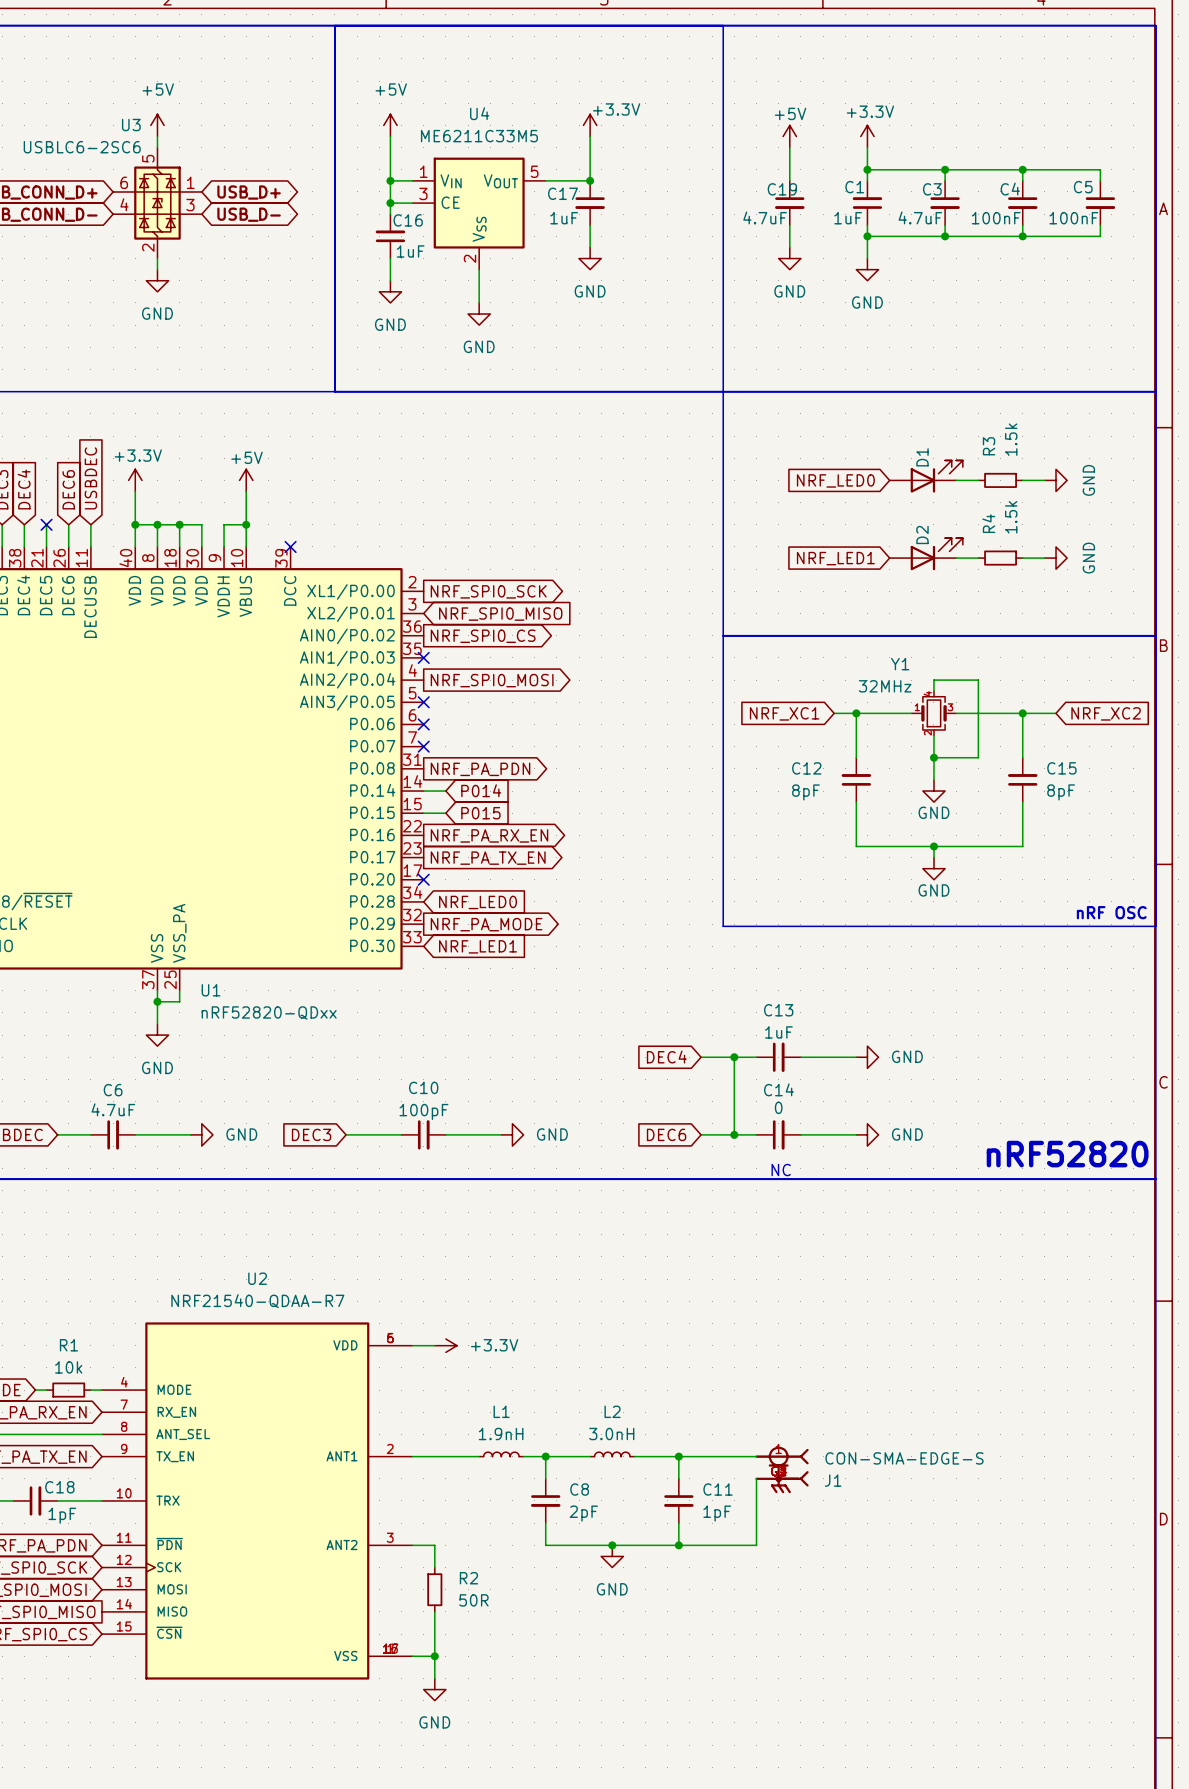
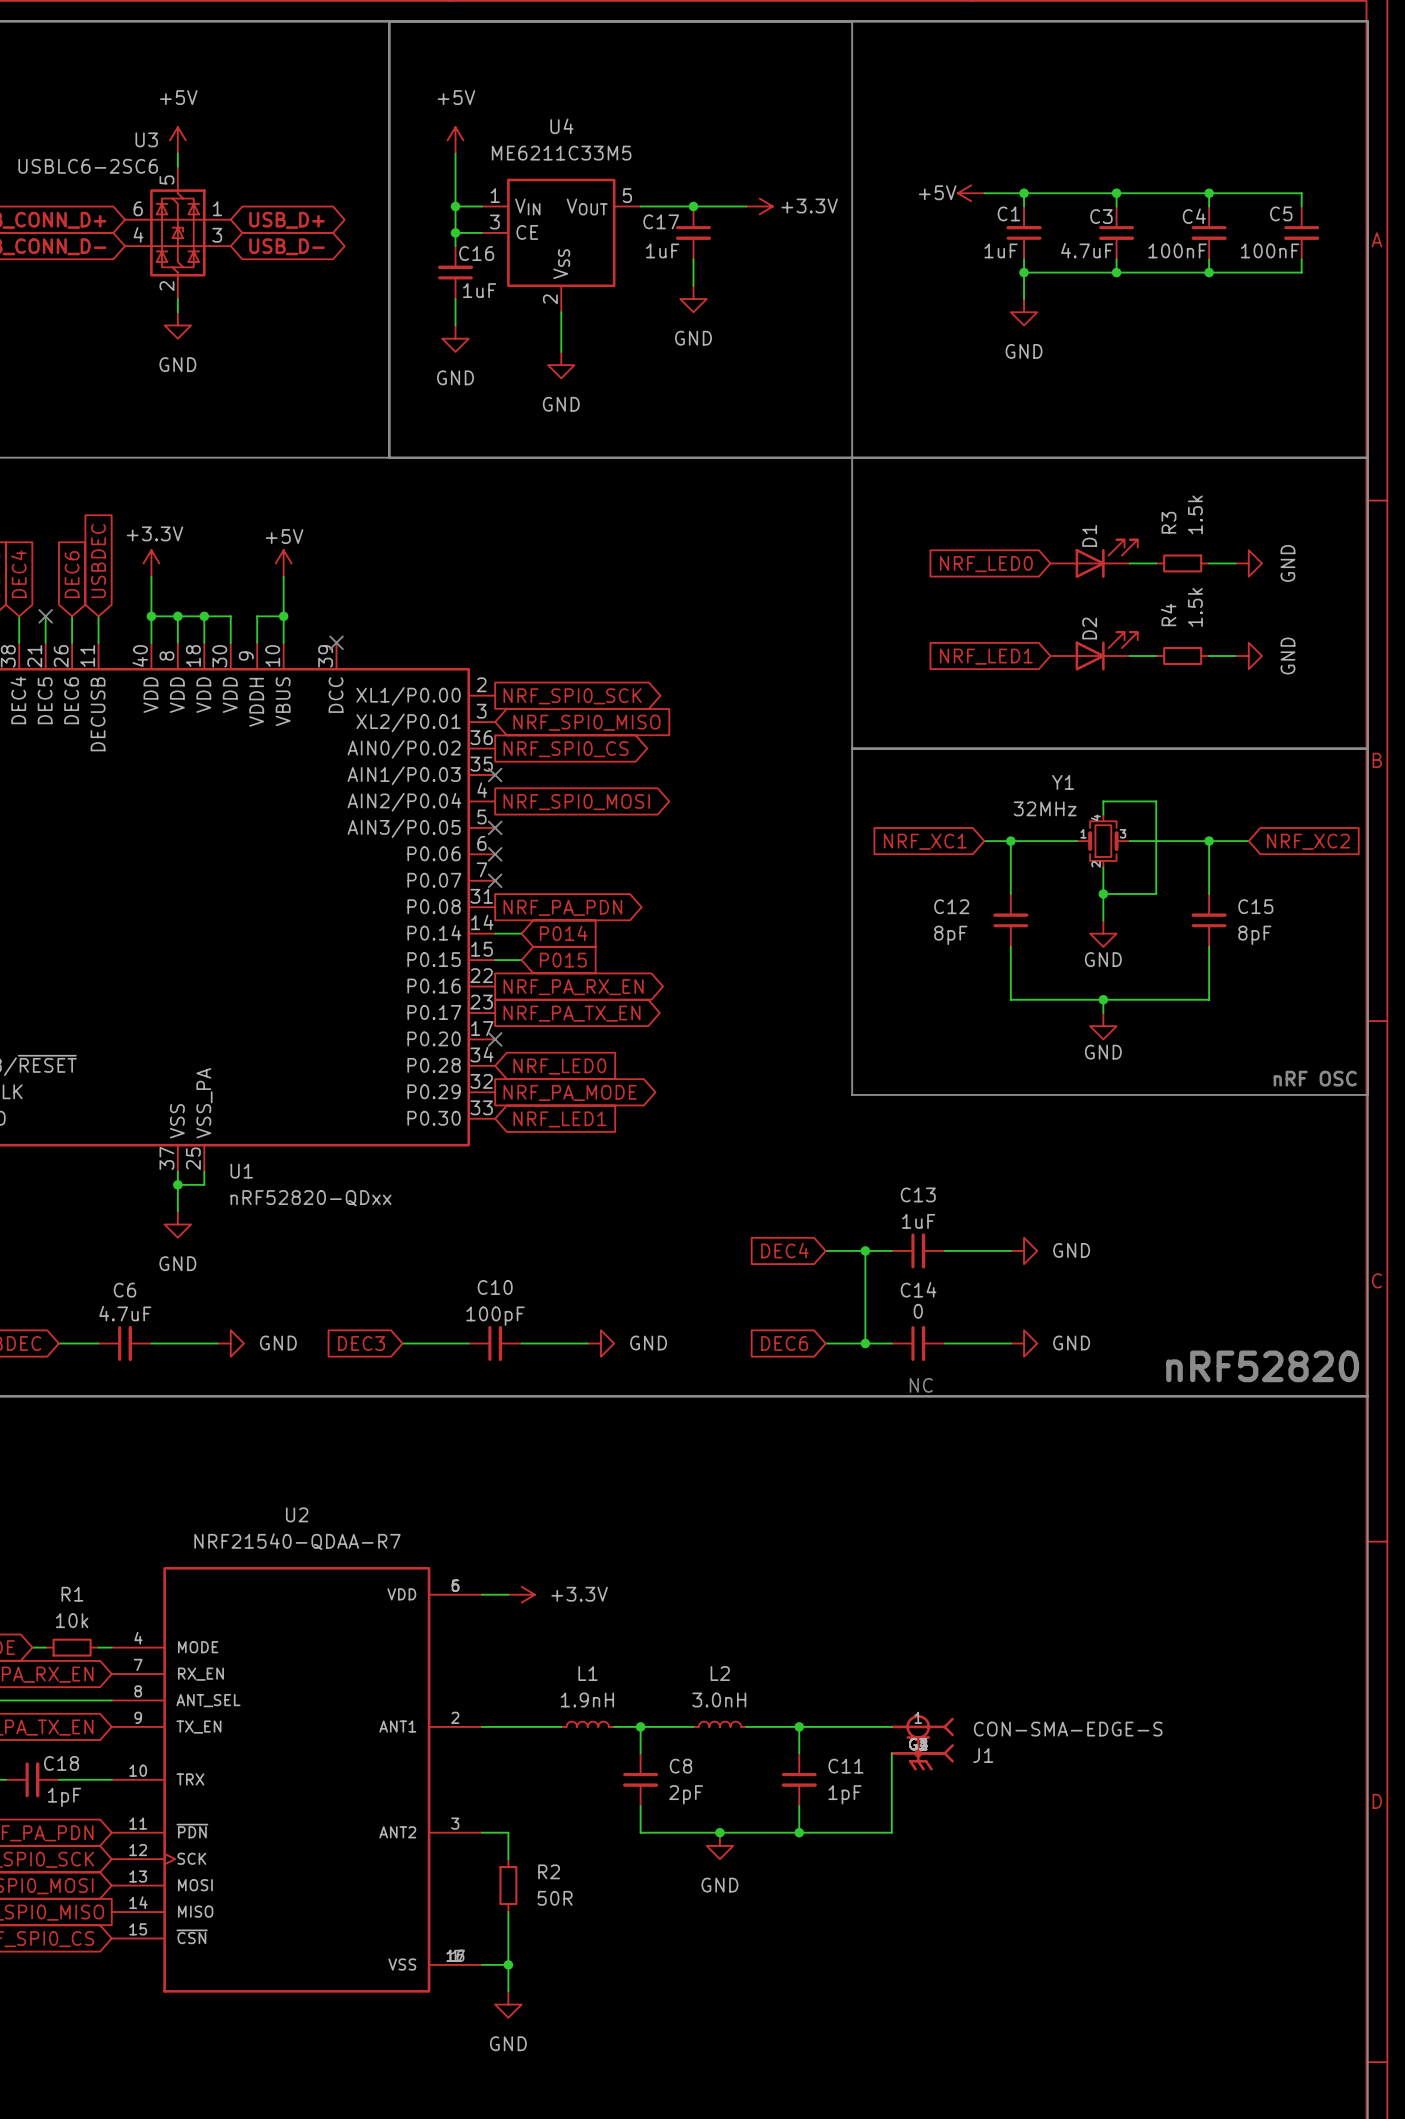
power symbol text position: +3.3V (616, 109) -> +3.3V (809, 205)
power symbol rotation: 0° (590, 125) -> 90° clockwise (759, 206)
power symbol position: +3.3V (590, 125) -> +3.3V (759, 206)
wire: (590, 136) (590, 180) -> (746, 206) (693, 206)
power symbol rotation: 0° (789, 136) -> 90° counterclockwise (971, 193)
power symbol position: +5V (789, 136) -> +5V (971, 193)
power symbol: +3.3V (867, 136) -> none
wire: (789, 147) (789, 180) -> none
wire: (867, 147) (867, 169) -> (984, 193) (1024, 193)
C19: 4.7uF (789, 203) -> none
wire: (789, 225) (789, 247) -> none
power symbol: GND (789, 258) -> none

